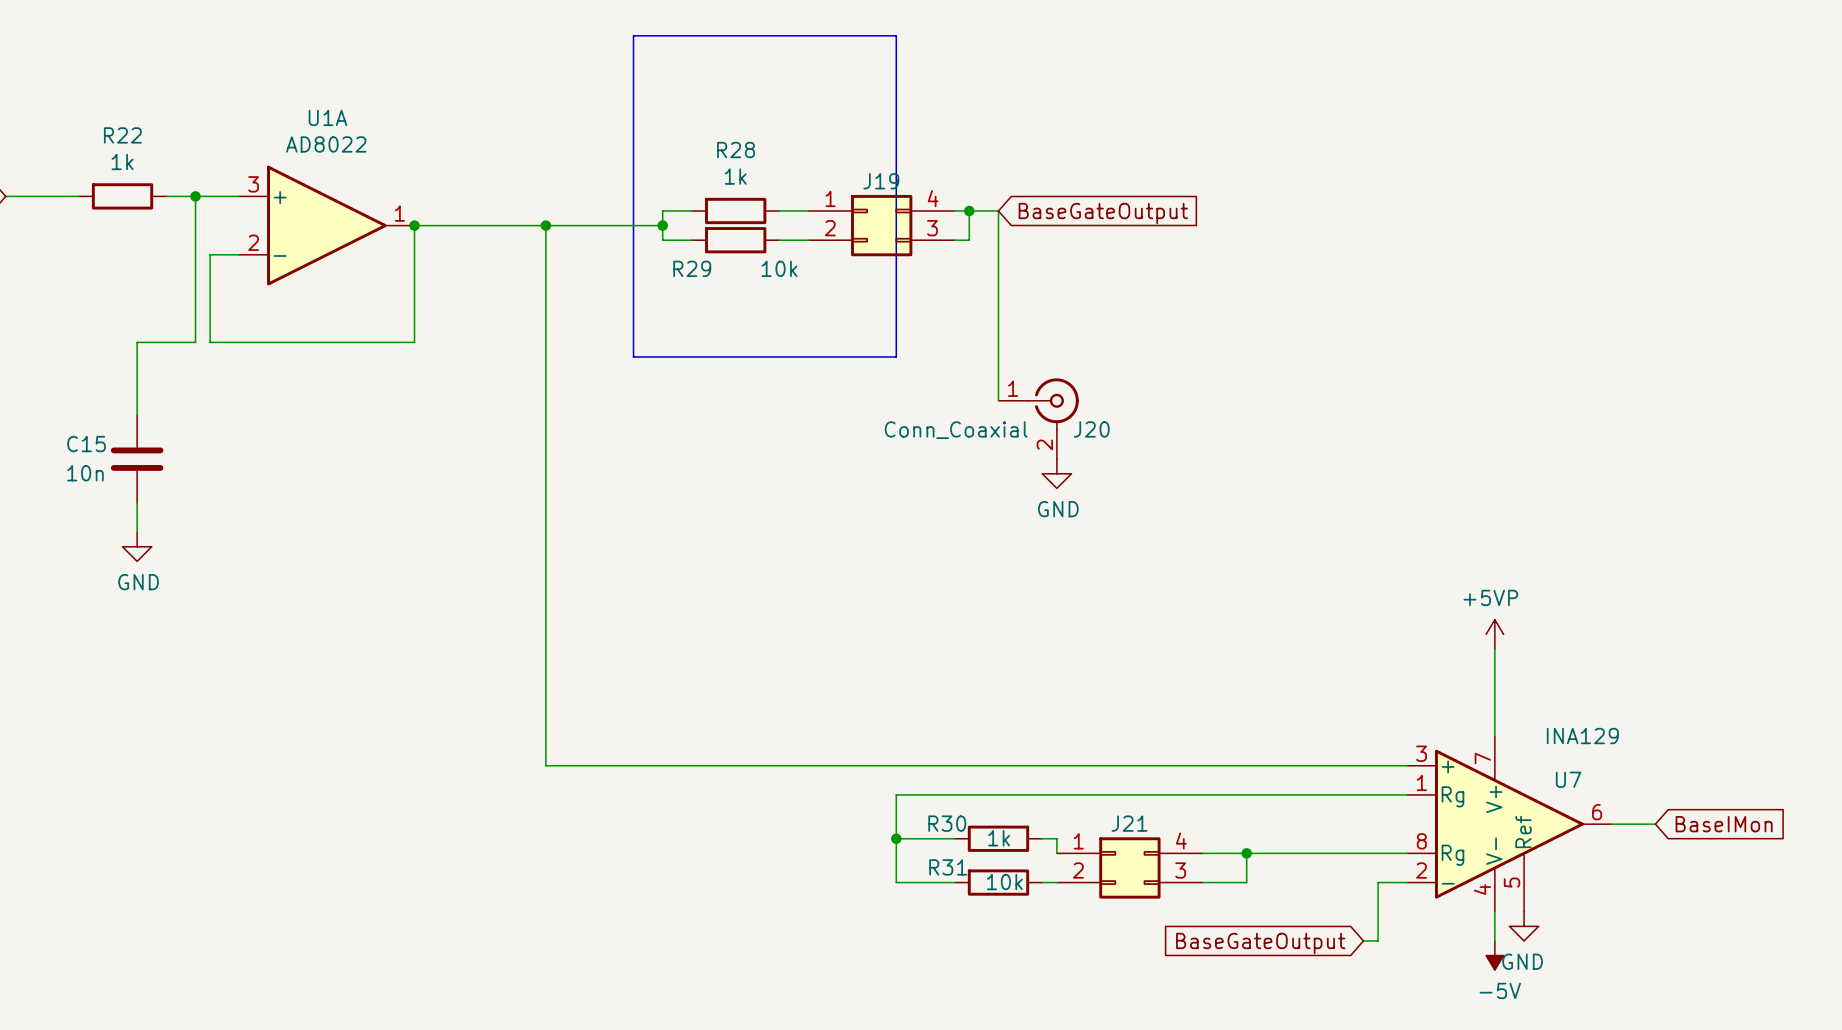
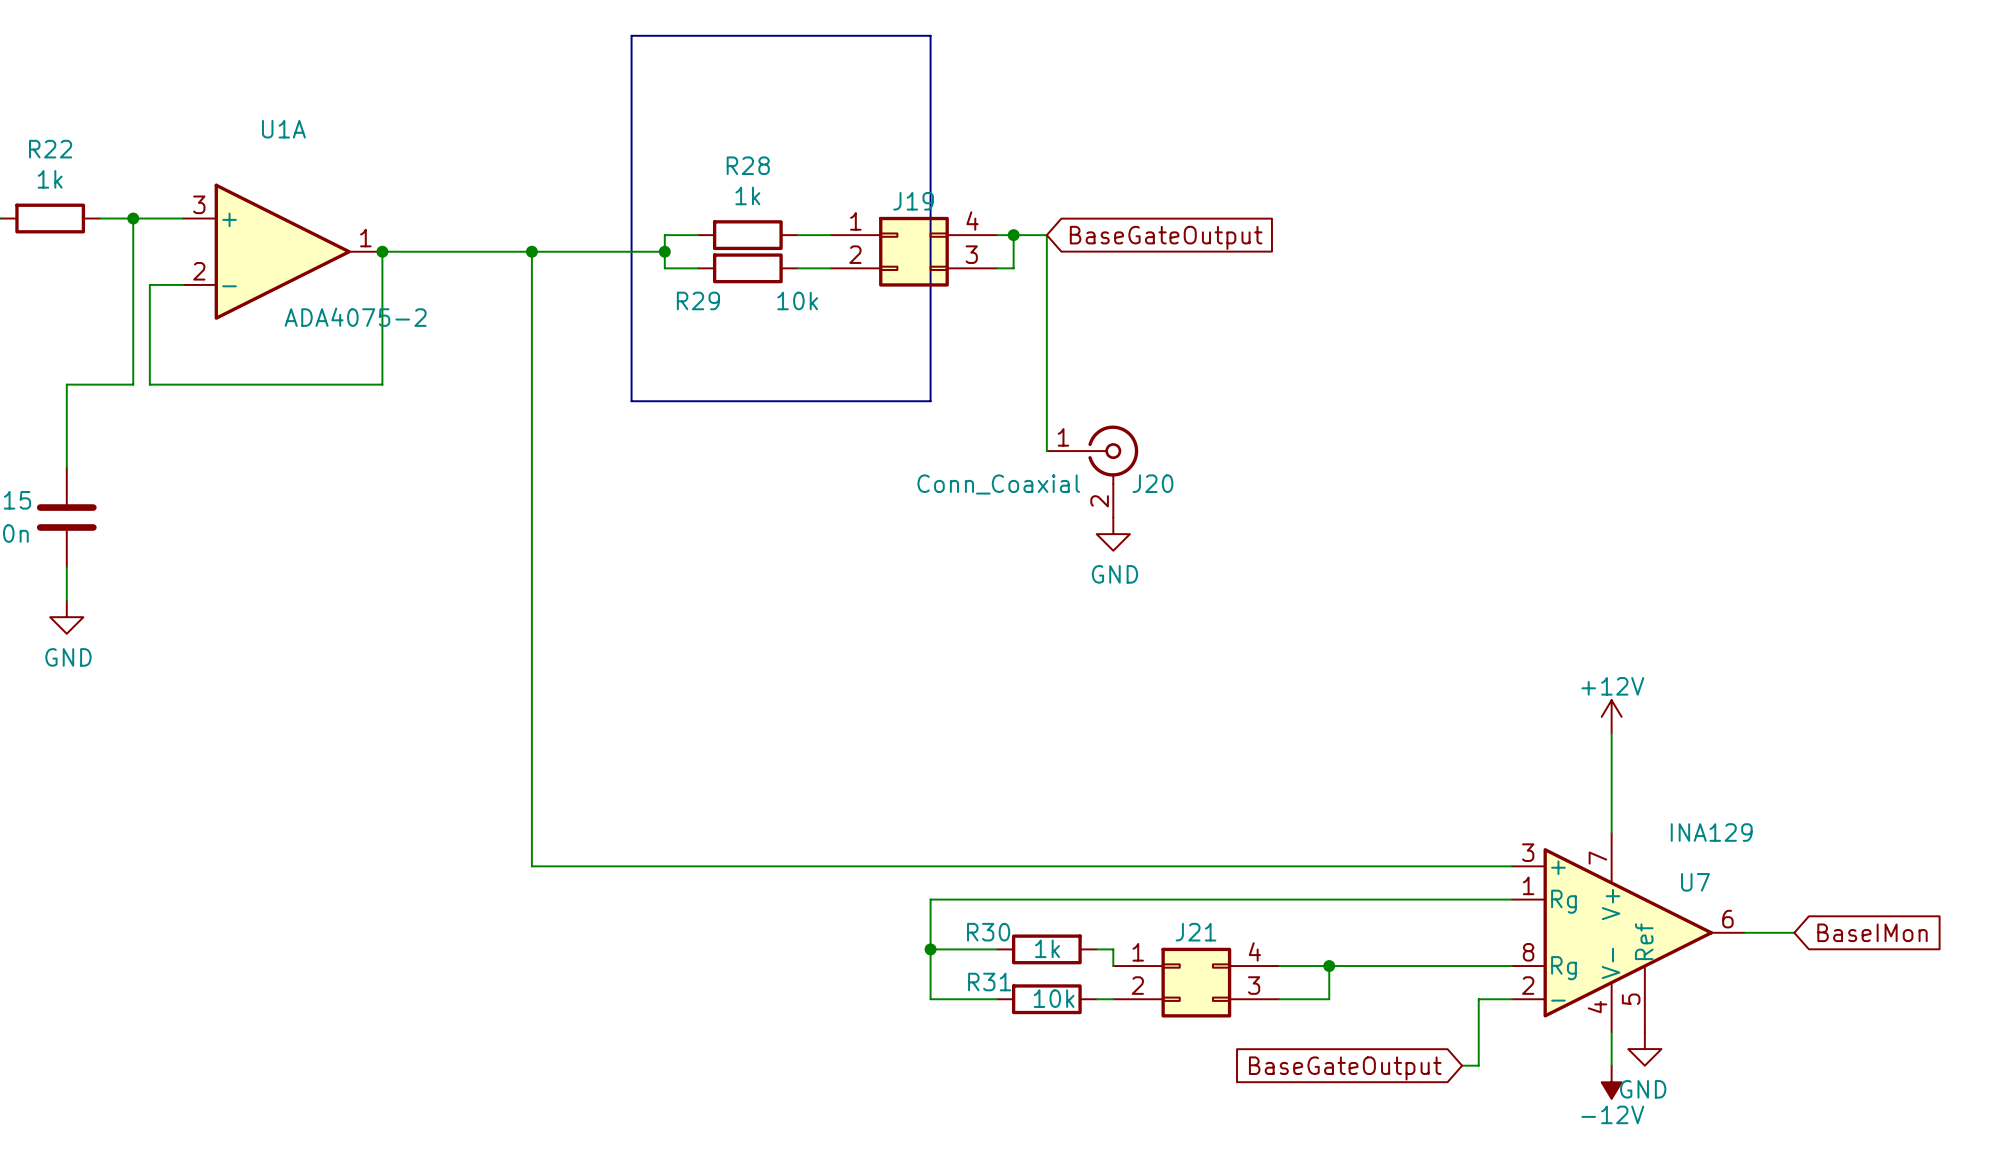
U1A value: AD8022 (326, 144) -> ADA4075-2 (355, 317)
power symbol: +5VP (1494, 634) -> +12V (1611, 716)
power symbol: -5V (1494, 955) -> -12V (1611, 1082)

